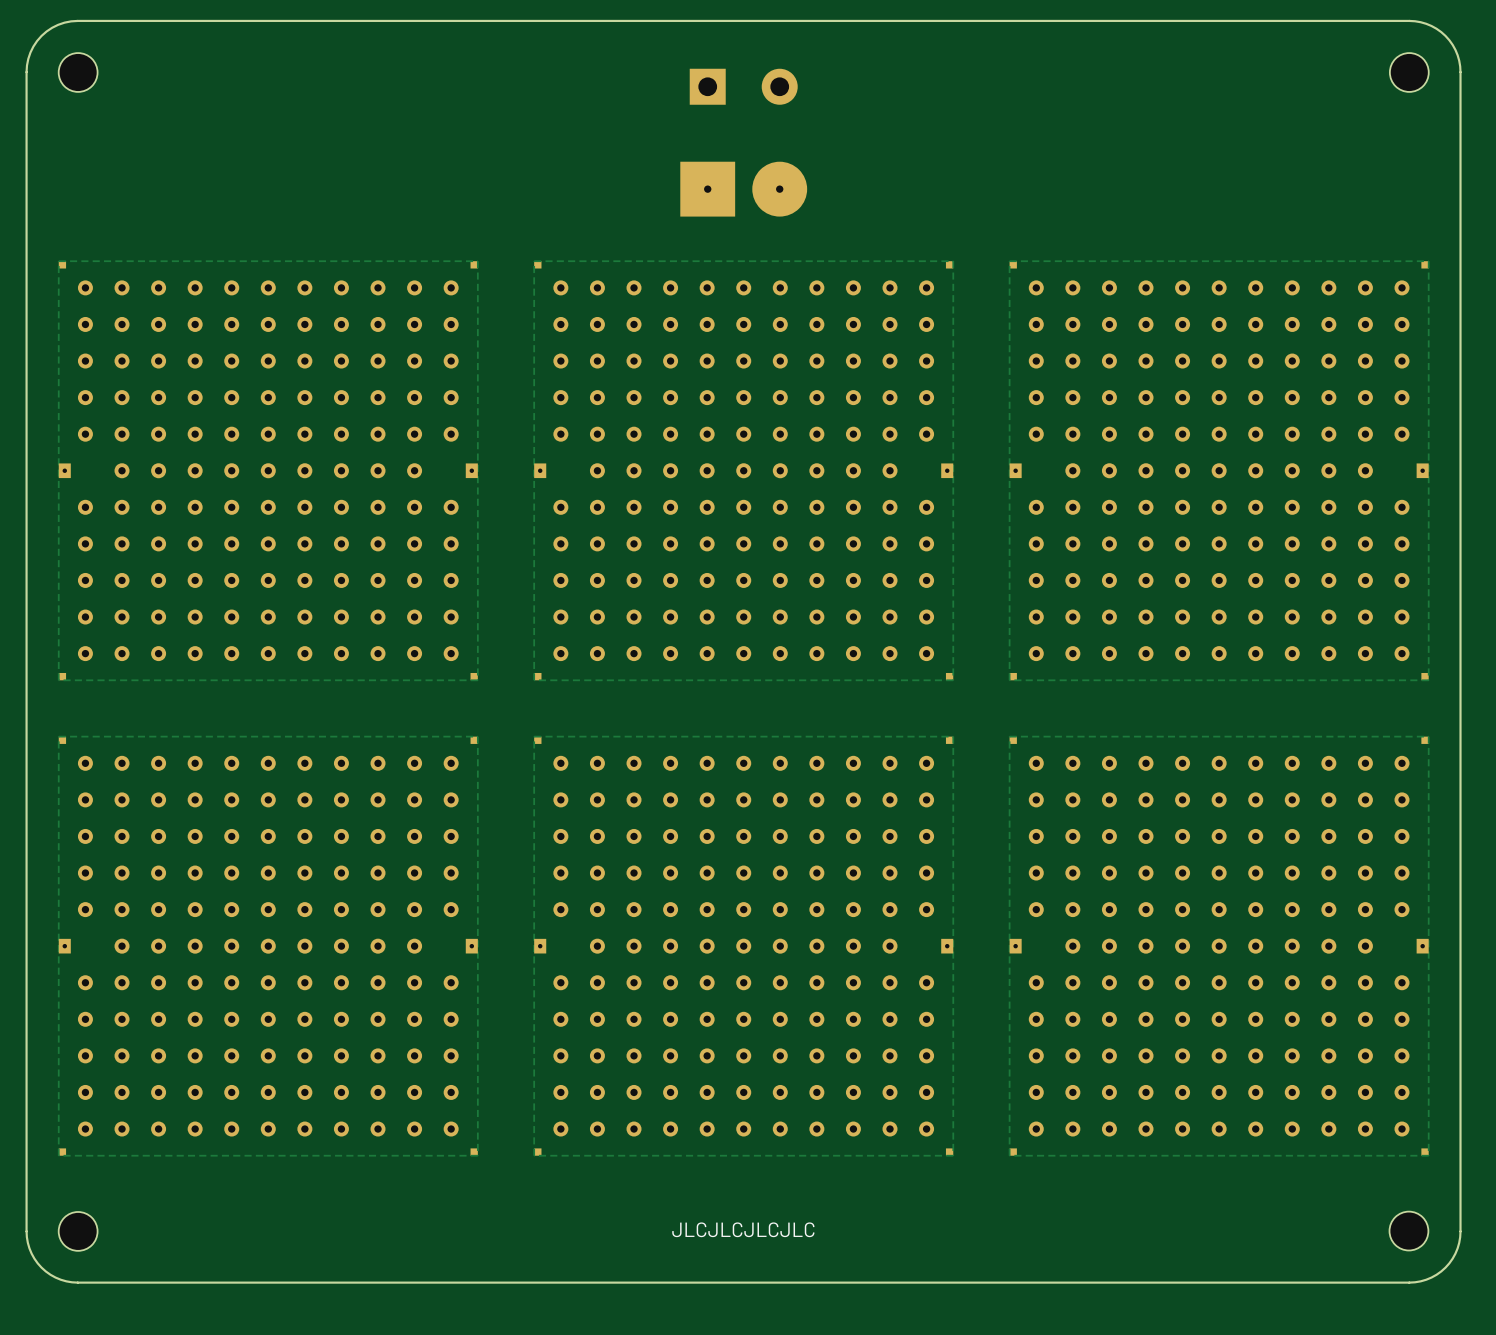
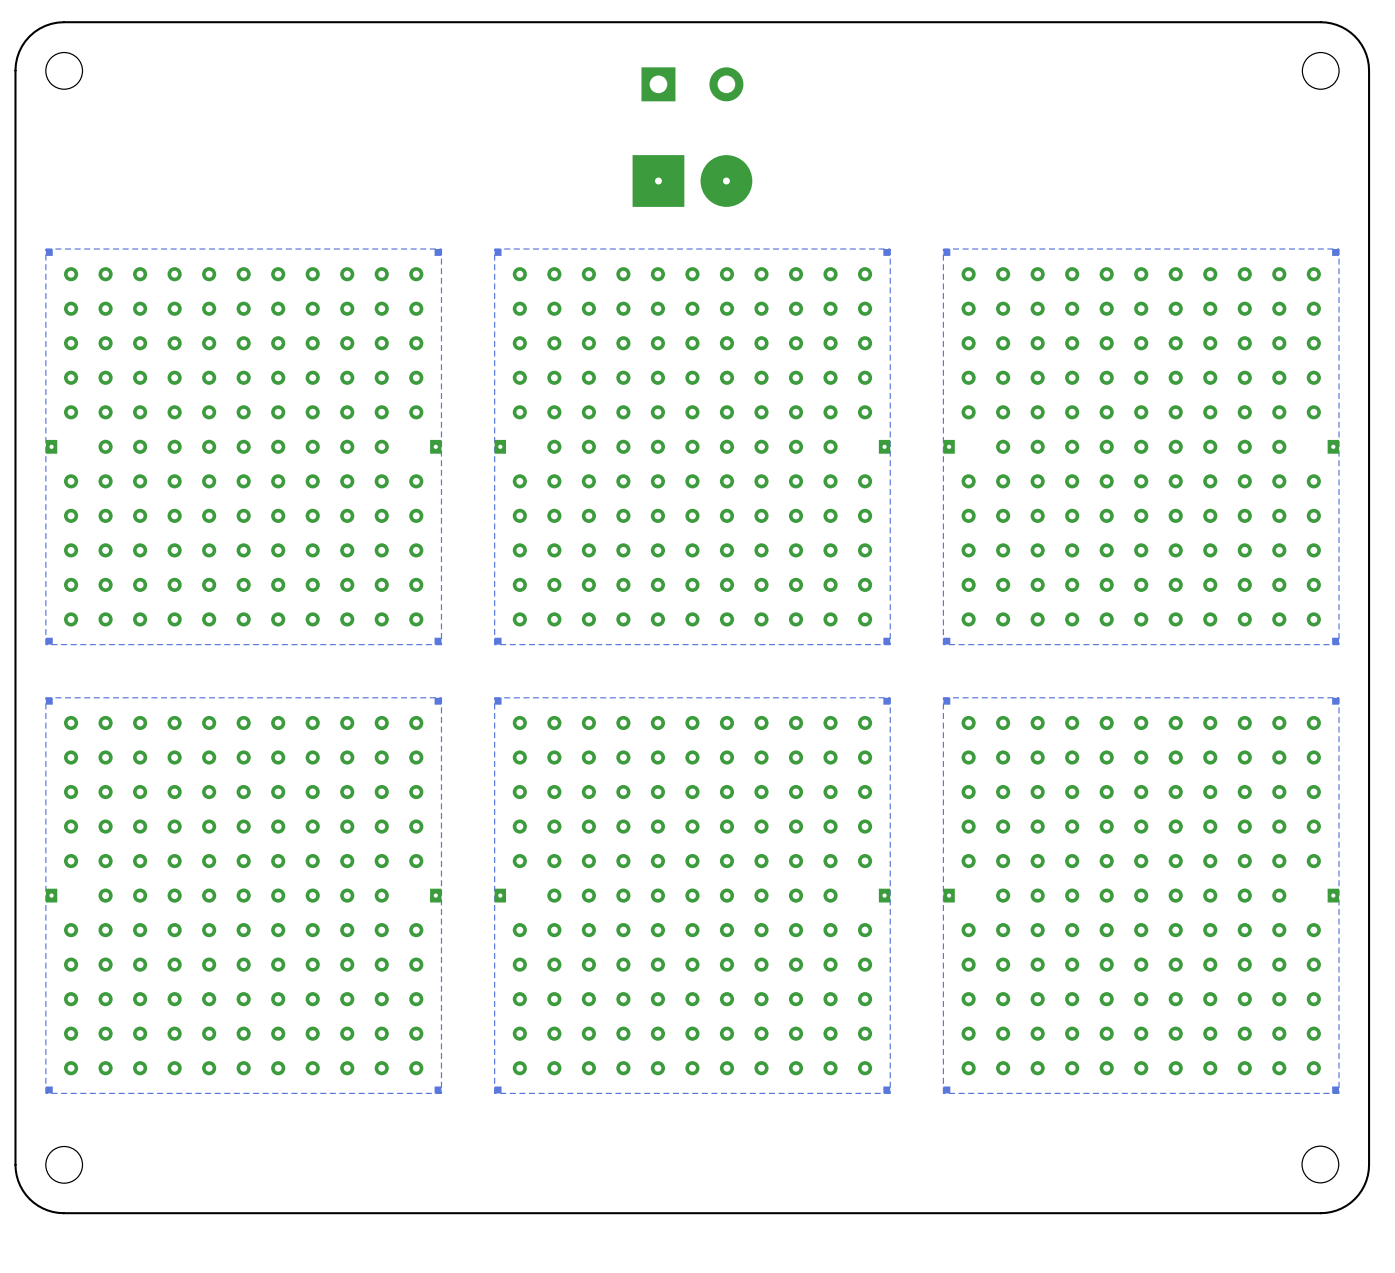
text: JLCJLCJLCJLC (743, 1229) -> none

